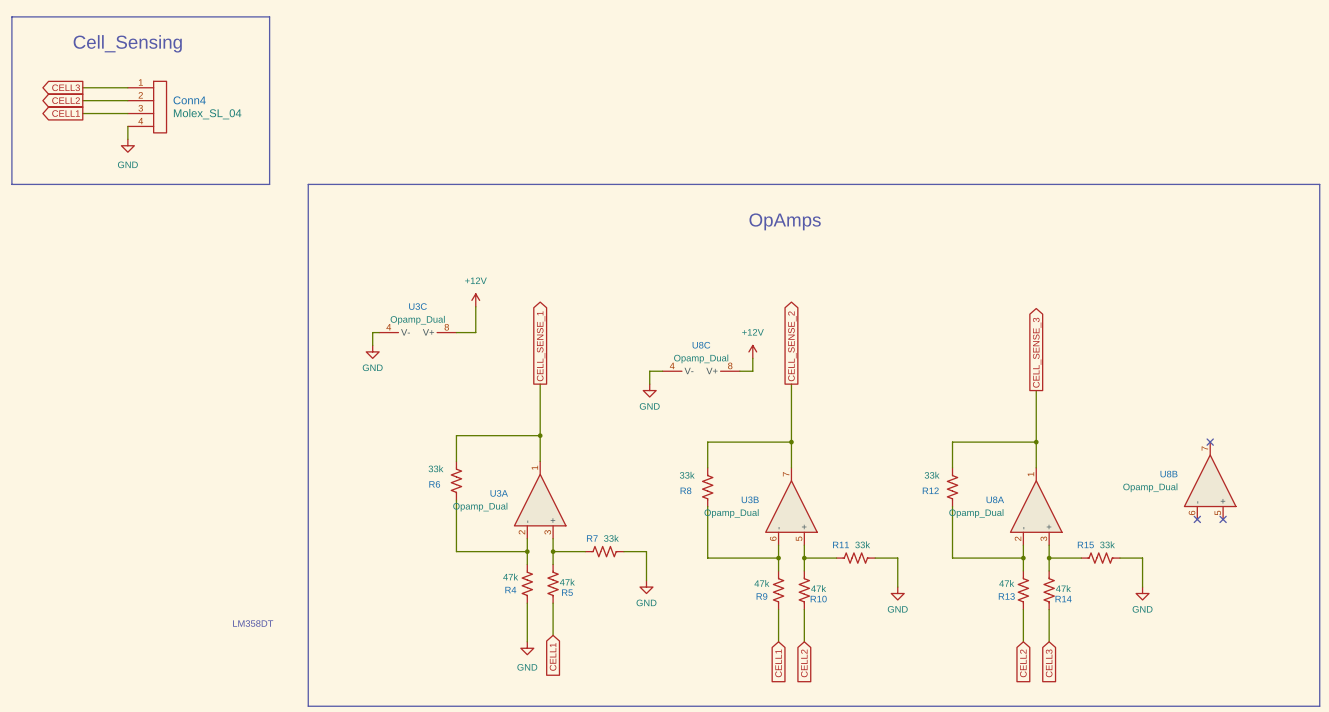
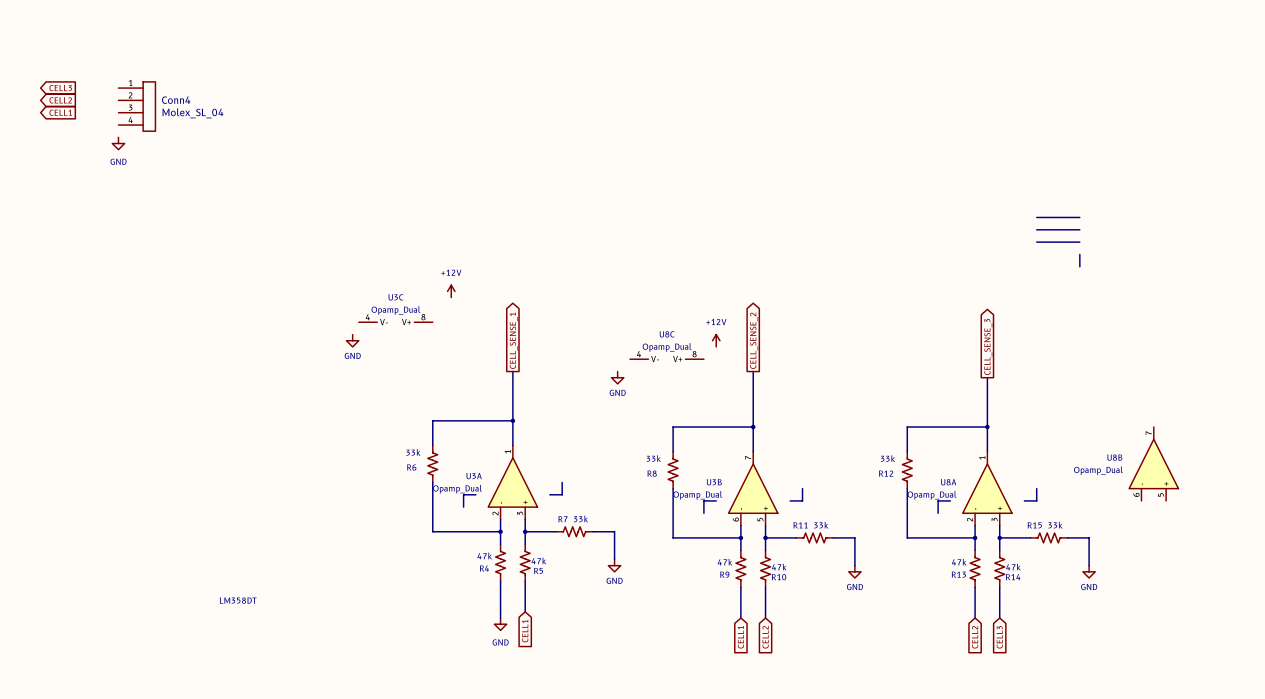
line: (11, 16) (269, 16) (269, 184) (11, 184) (11, 16) -> none
text: Cell_Sensing (127, 43) -> none
wire: (82, 87) (127, 87) -> none
wire: (82, 100) (127, 100) -> none
wire: (82, 113) (127, 113) -> none
wire: (127, 126) (127, 139) -> none
line: (308, 184) (1319, 184) (1319, 706) (308, 706) (308, 184) -> none
text: OpAmps (785, 221) -> none
wire: none -> (1036, 217) (1079, 217)
wire: none -> (1036, 229) (1079, 229)
wire: none -> (1036, 242) (1079, 242)
wire: none -> (1079, 254) (1079, 266)
wire: (475, 306) (475, 332) (456, 332) -> none
wire: (379, 332) (372, 332) (372, 345) -> none
wire: (752, 358) (752, 371) (739, 371) -> none
wire: (662, 371) (649, 371) (649, 384) -> none
no-connect mark: (1210, 442) -> none
wire: none -> (562, 482) (562, 494) (549, 494)
wire: none -> (802, 488) (802, 500) (790, 500)
wire: none -> (1036, 488) (1036, 500) (1024, 500)
wire: none -> (475, 494) (463, 494) (463, 507)
wire: none -> (716, 500) (703, 500) (703, 513)
wire: none -> (950, 500) (938, 500) (938, 513)
no-connect mark: (1197, 519) -> none
no-connect mark: (1223, 519) -> none

